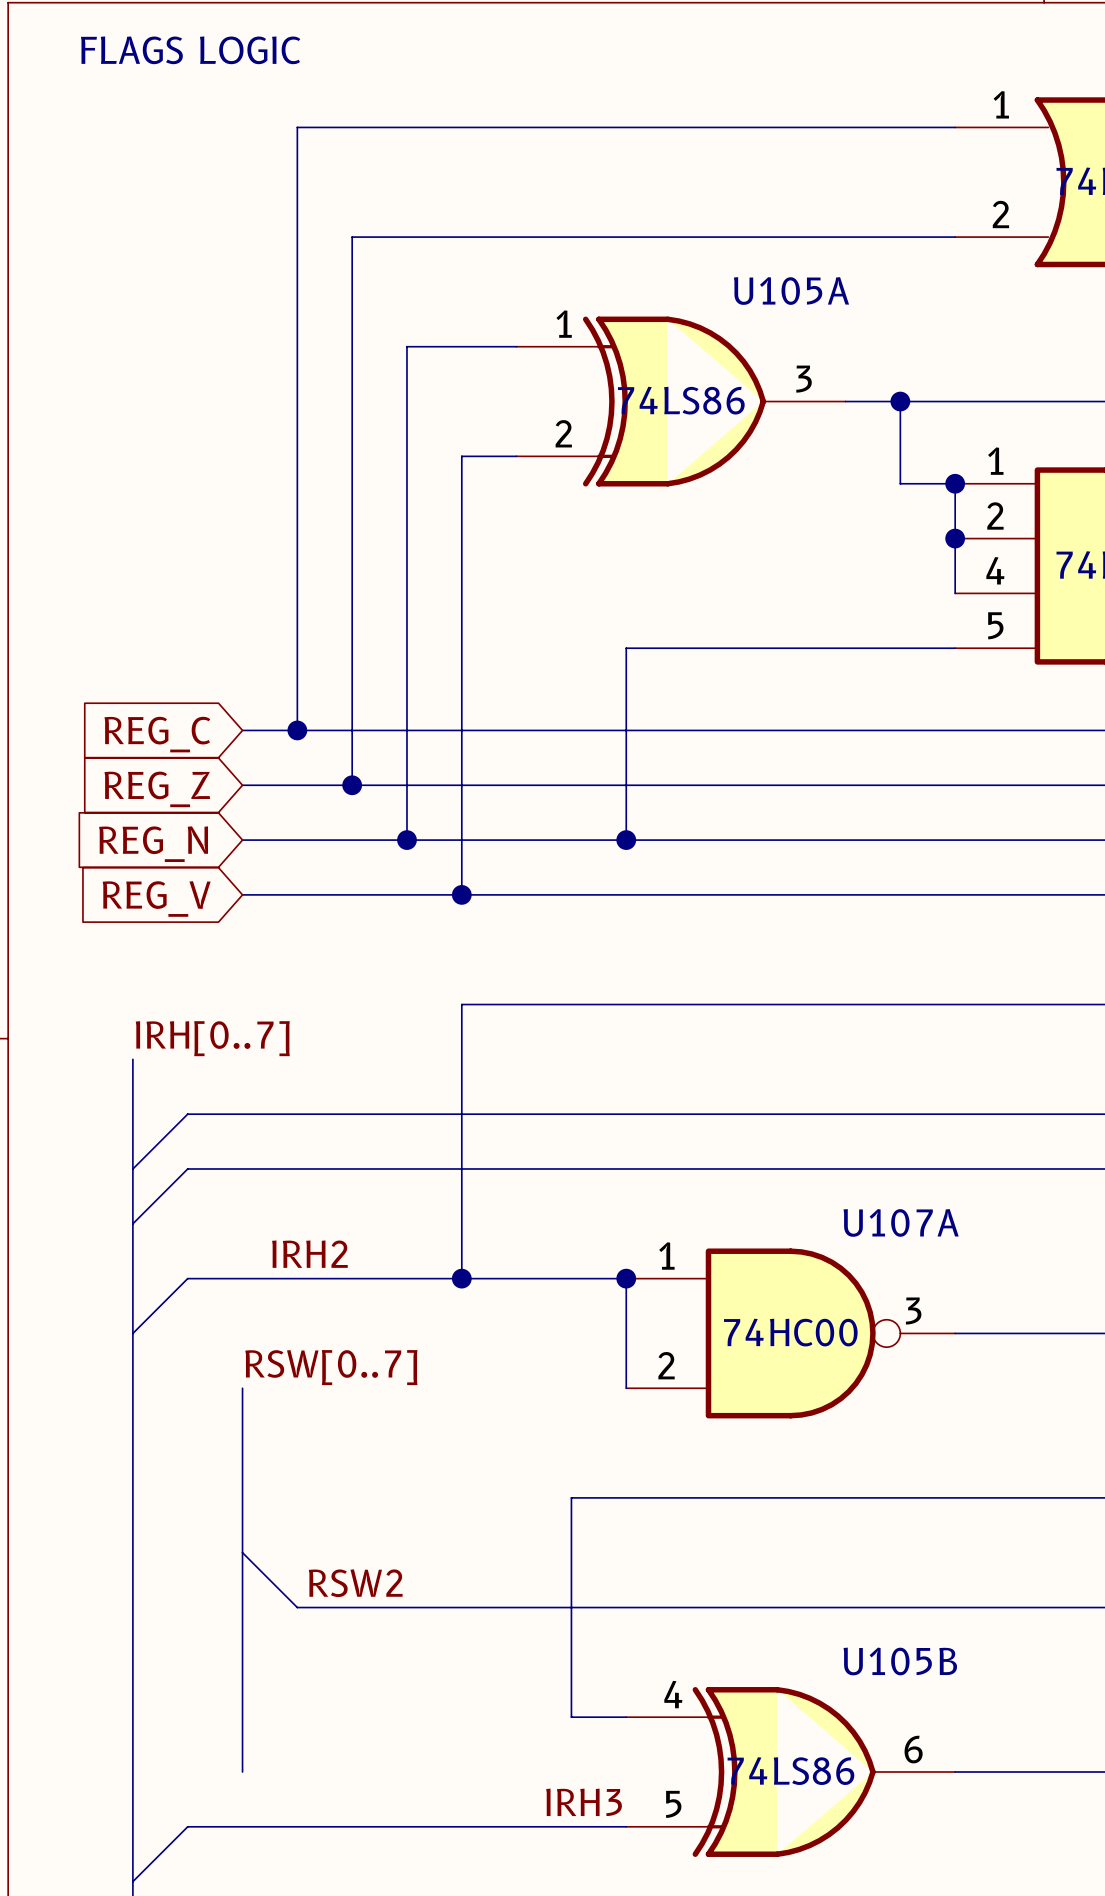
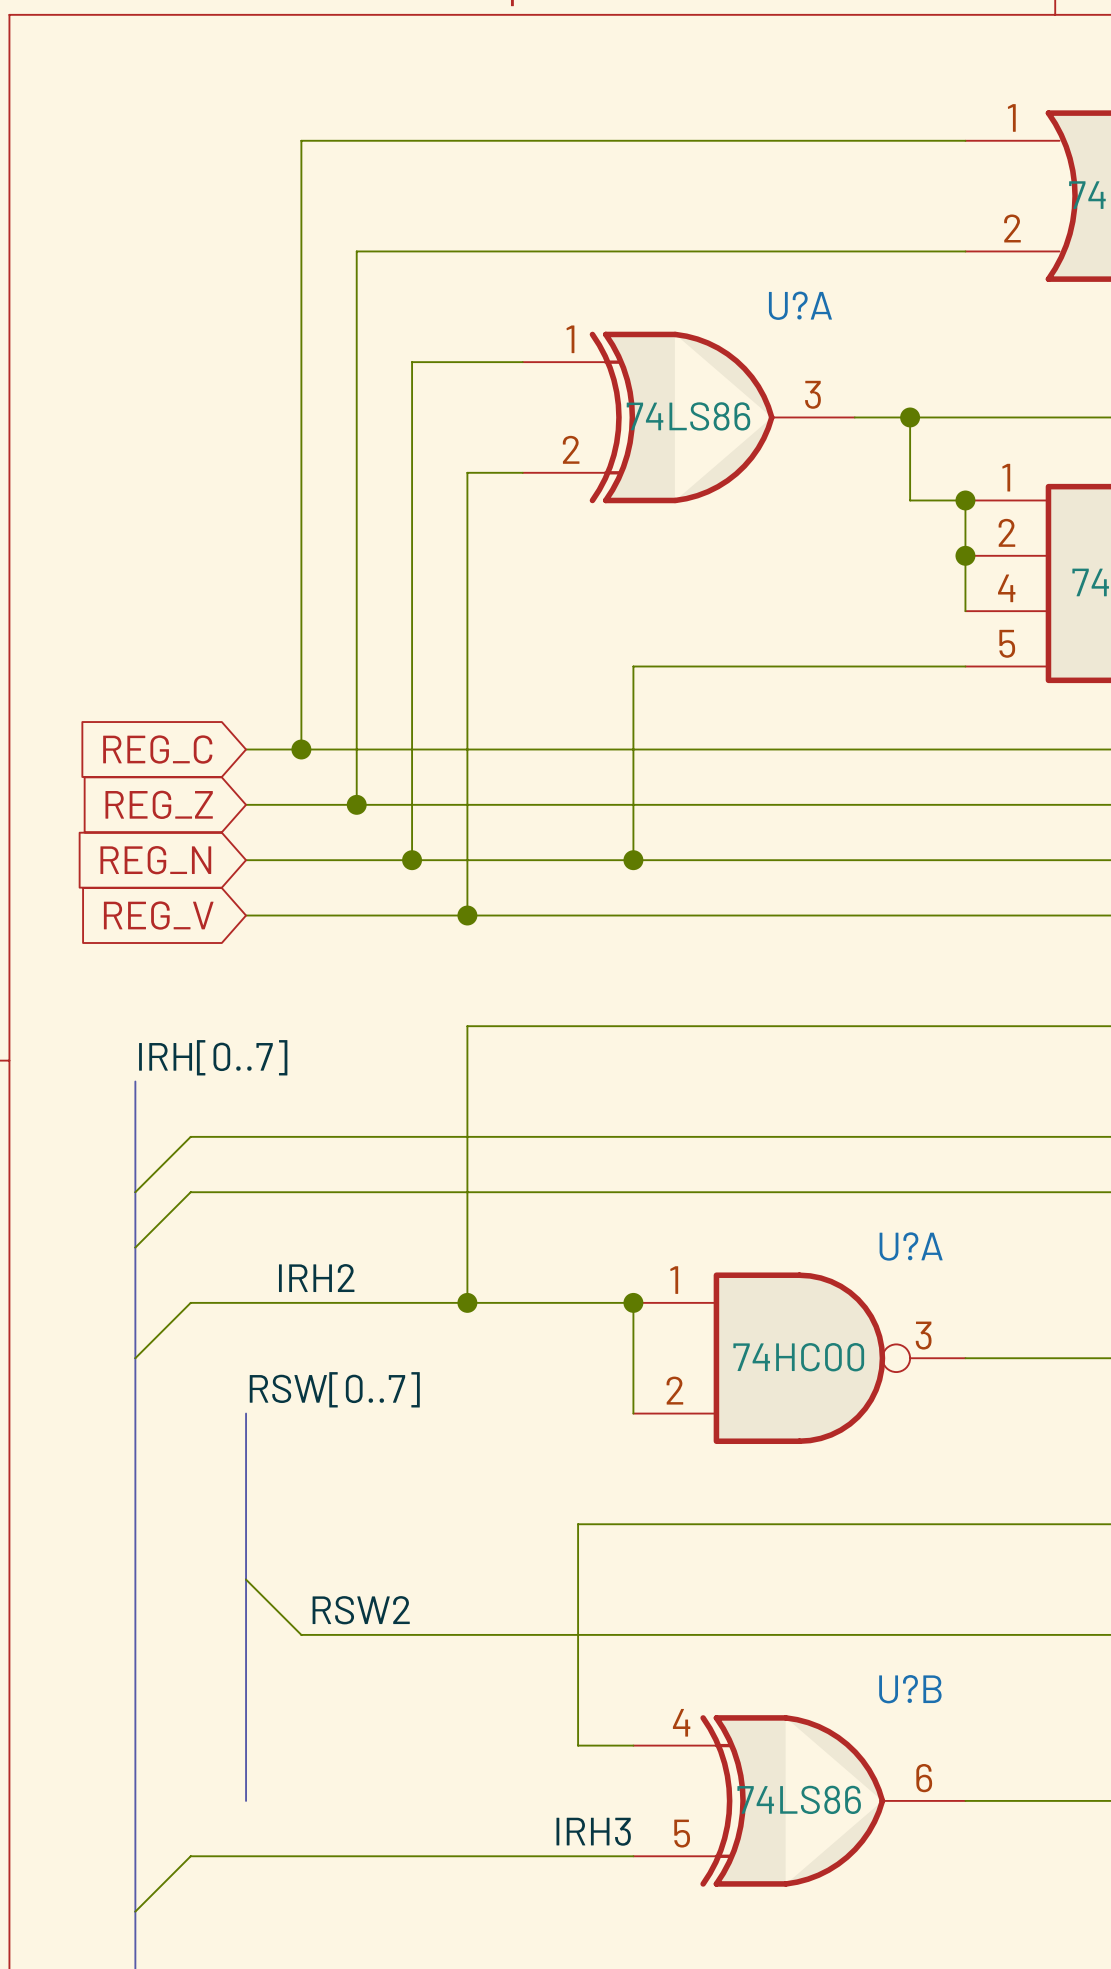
text: FLAGS LOGIC (190, 50) -> none
U105A name: U105A (791, 291) -> U?A (800, 305)
U107A name: U107A (901, 1222) -> U?A (911, 1246)
U105B name: U105B (900, 1661) -> U?B (910, 1689)

